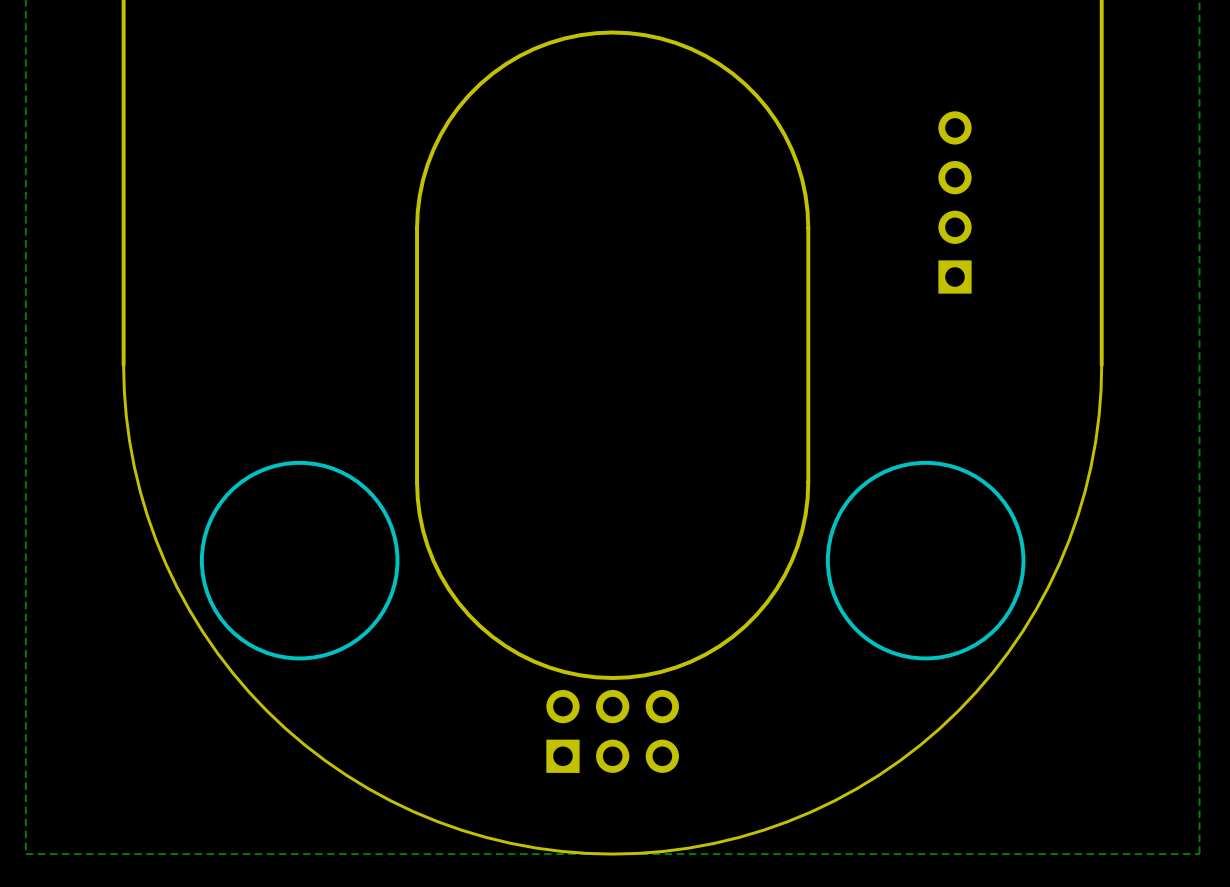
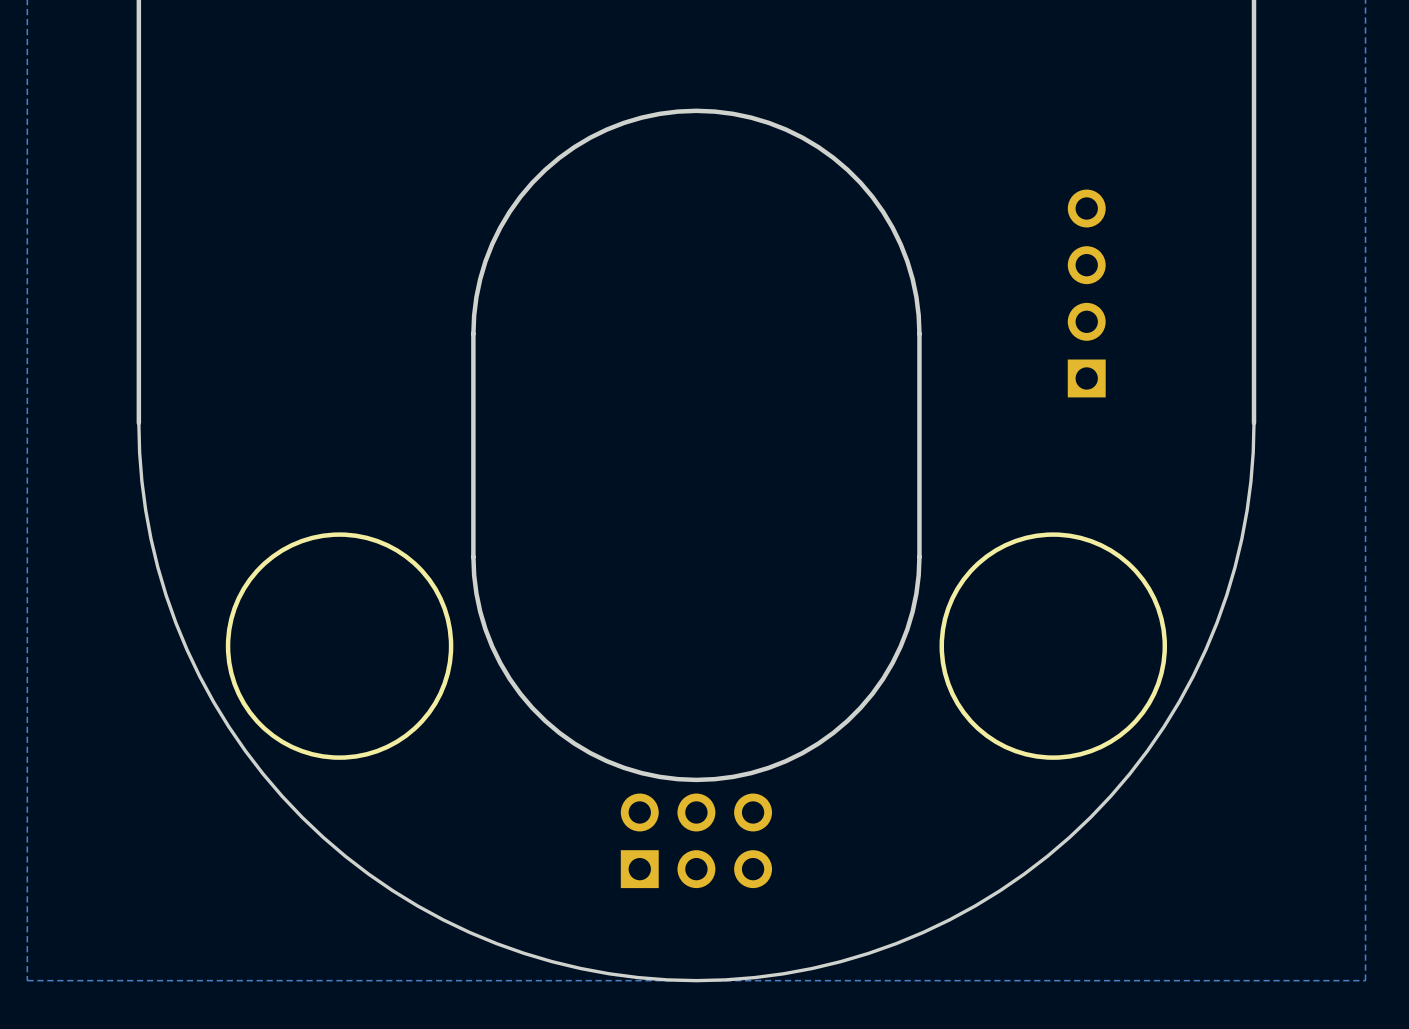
part position: (955, 202) -> (1086, 293)
board edge: (808, 286) (807, 211) (802, 180) (791, 149) (767, 107) (732, 73) (705, 56) (660, 38) (612, 32) (564, 38) (519, 56) (480, 84) (458, 107) (440, 135) (423, 180) (417, 211) (417, 286) -> (919, 333) (916, 297) (907, 261) (900, 244) (883, 211) (860, 182) (833, 157) (802, 137) (786, 129) (768, 122) (733, 113) (696, 110) (659, 113) (624, 122) (606, 129) (574, 147) (545, 169) (532, 182) (509, 211) (500, 227) (485, 261) (476, 297) (473, 333)

